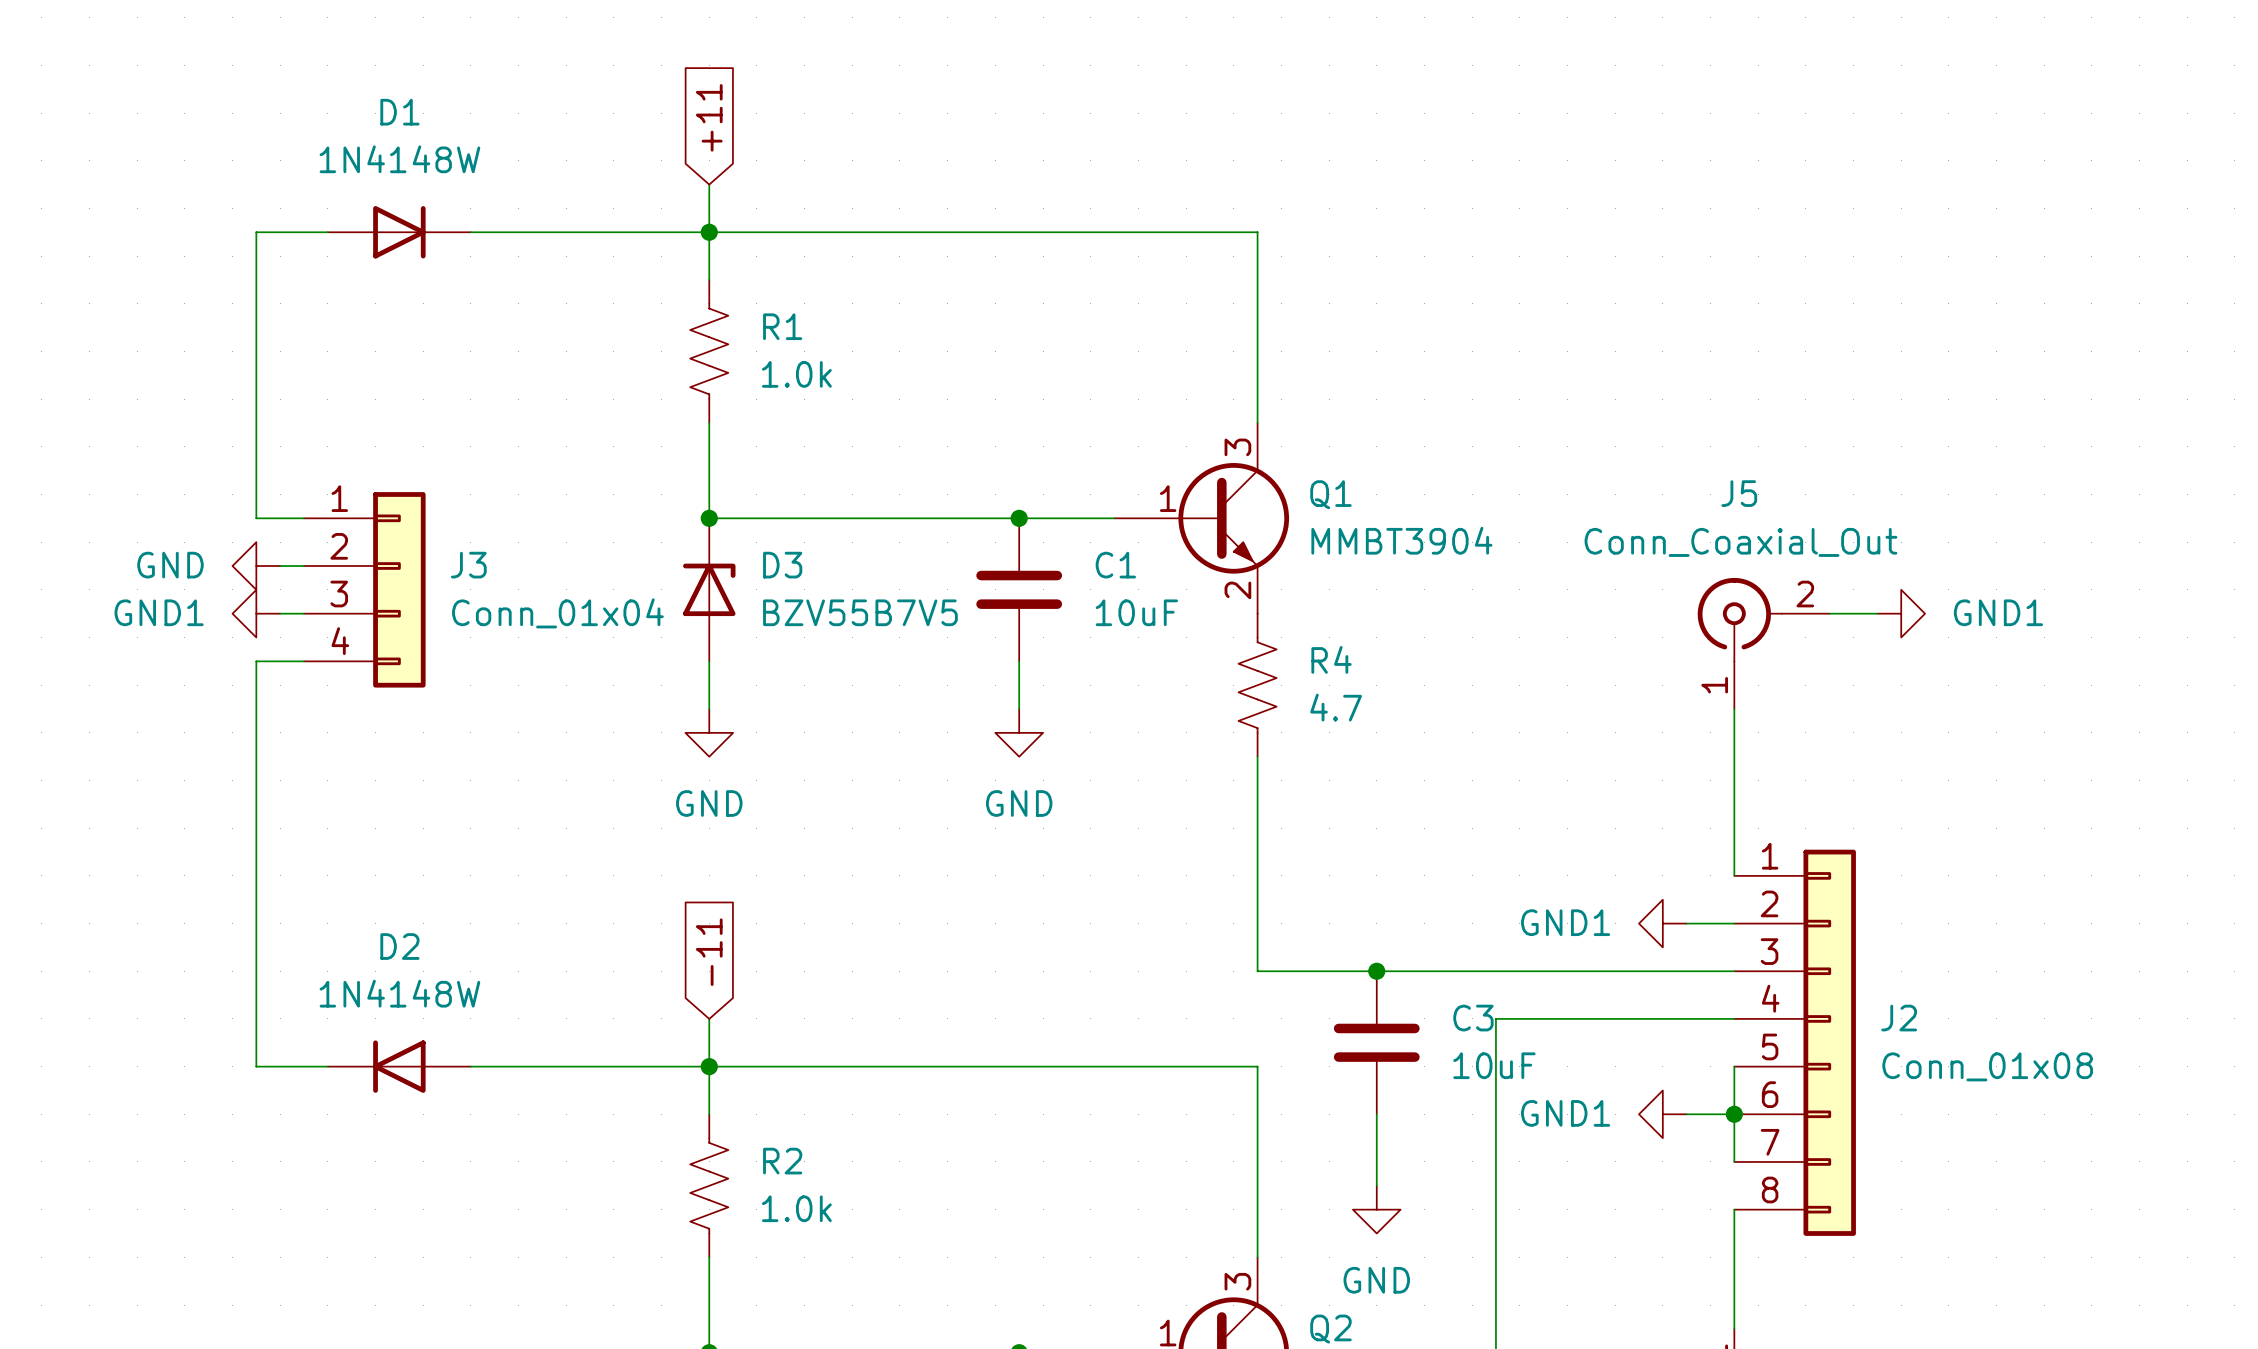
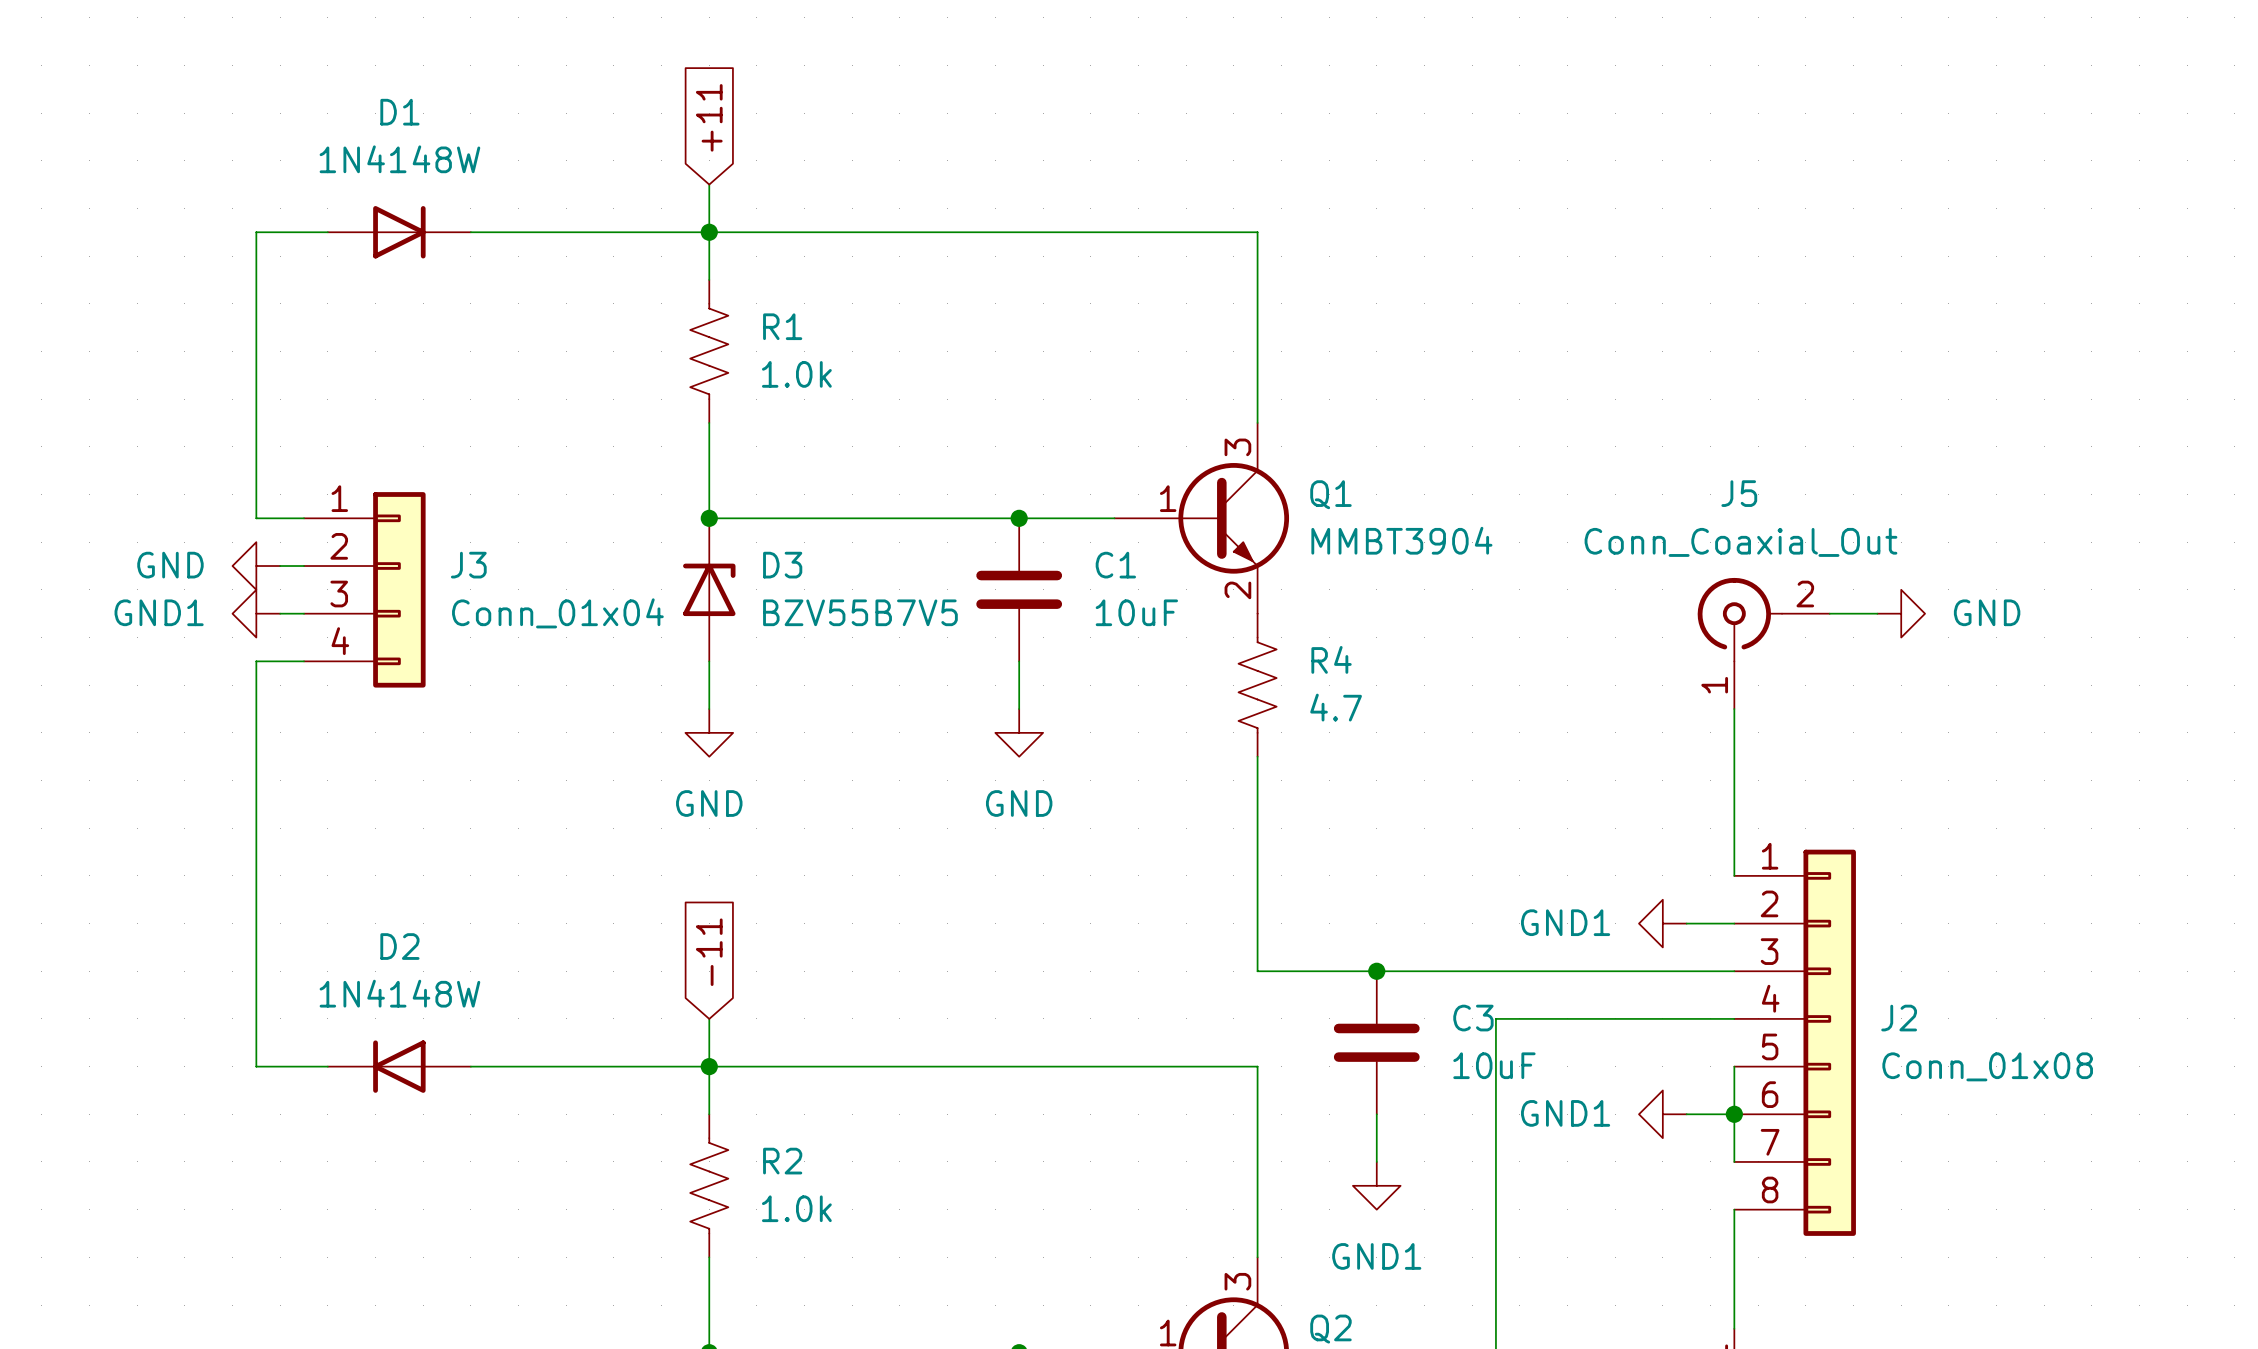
power symbol: GND1 (1901, 613) -> GND (1901, 613)
power symbol: none -> GND1 (1376, 1185)
power symbol: GND (1376, 1209) -> none

